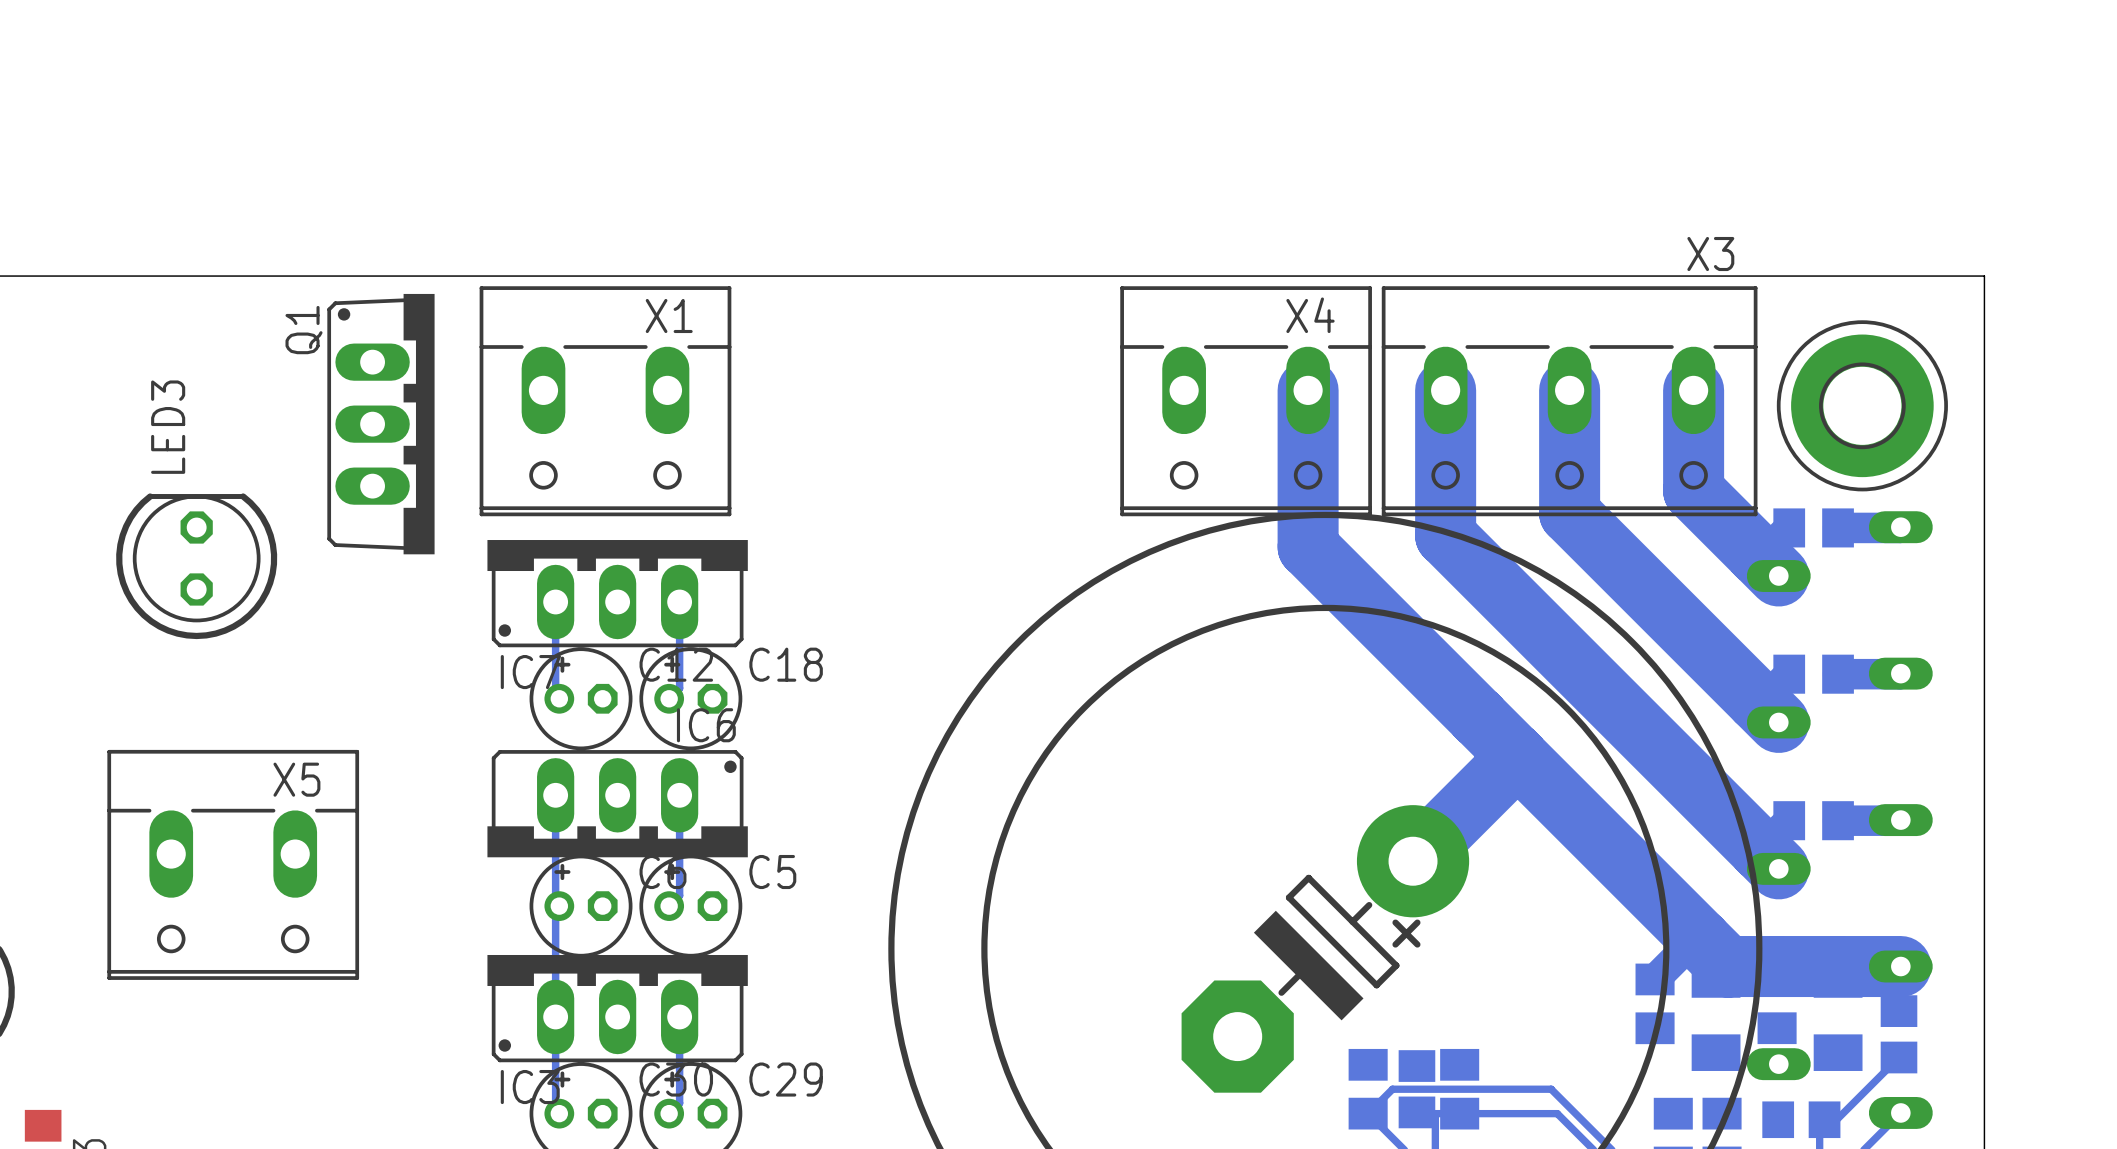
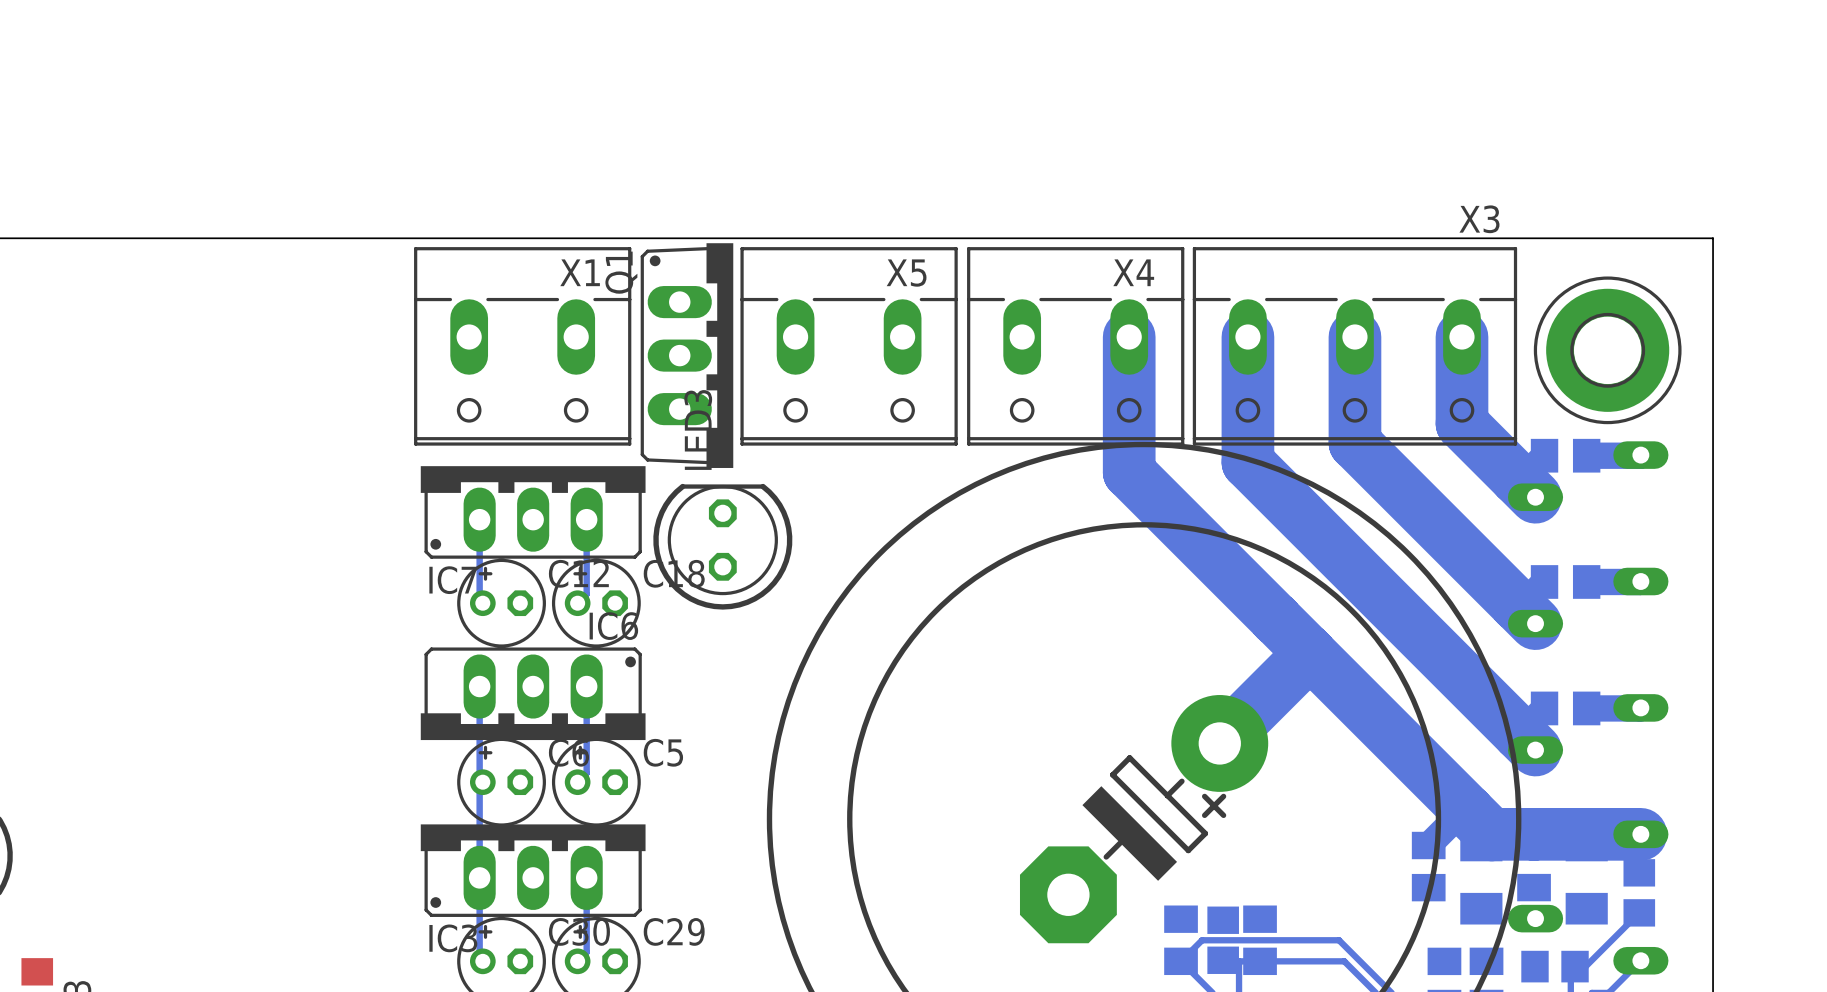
Q1 footprint: [327, 293, 435, 555] -> [640, 243, 734, 468]
LED3 position: (196, 566) -> (722, 546)
X5 position: (233, 864) -> (849, 346)

